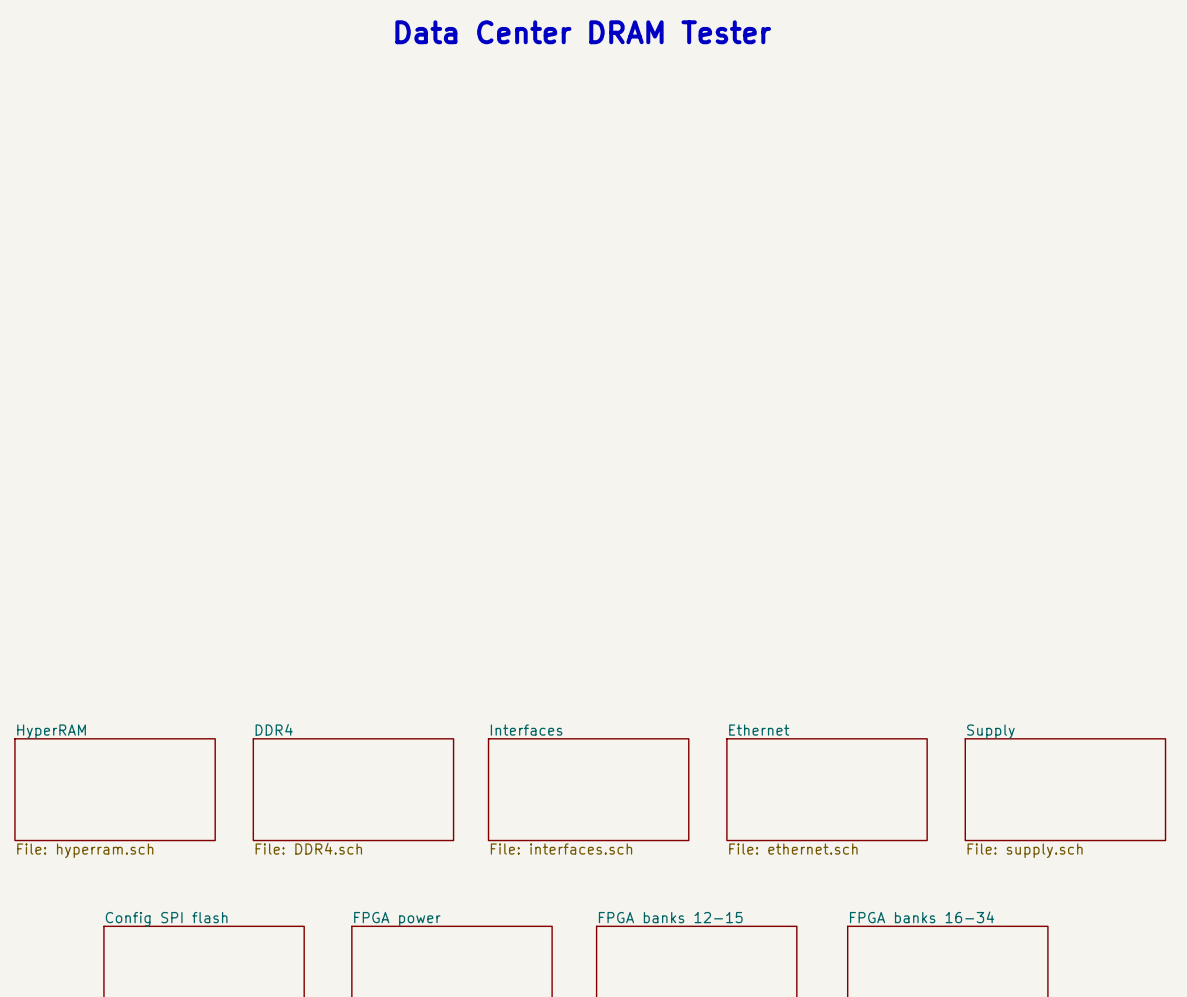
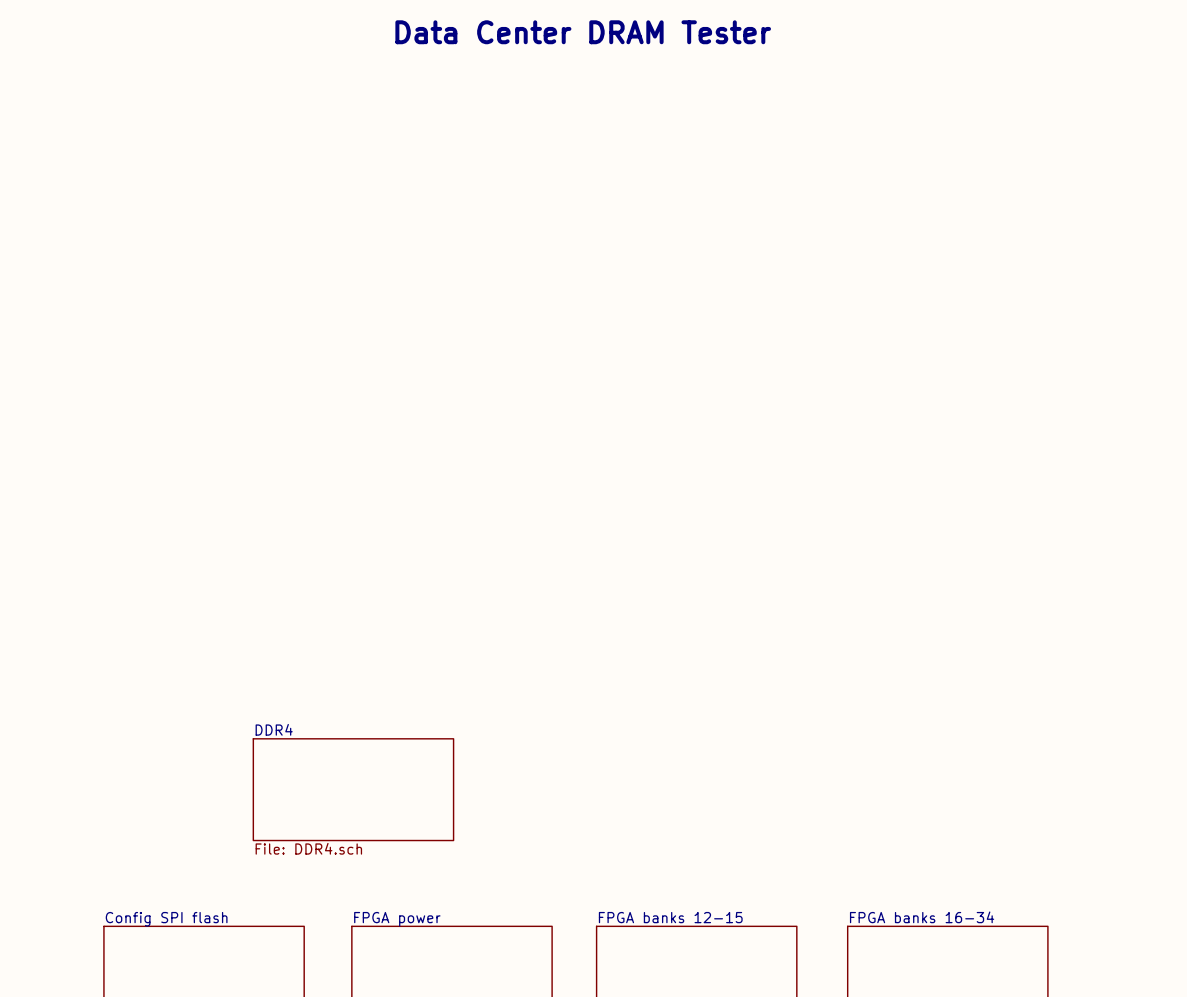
sheet HyperRAM: File: hyperram.sch (115, 789) -> none
sheet Interfaces: File: interfaces.sch (588, 789) -> none
sheet Ethernet: File: ethernet.sch (827, 789) -> none
sheet Supply: File: supply.sch (1065, 789) -> none

